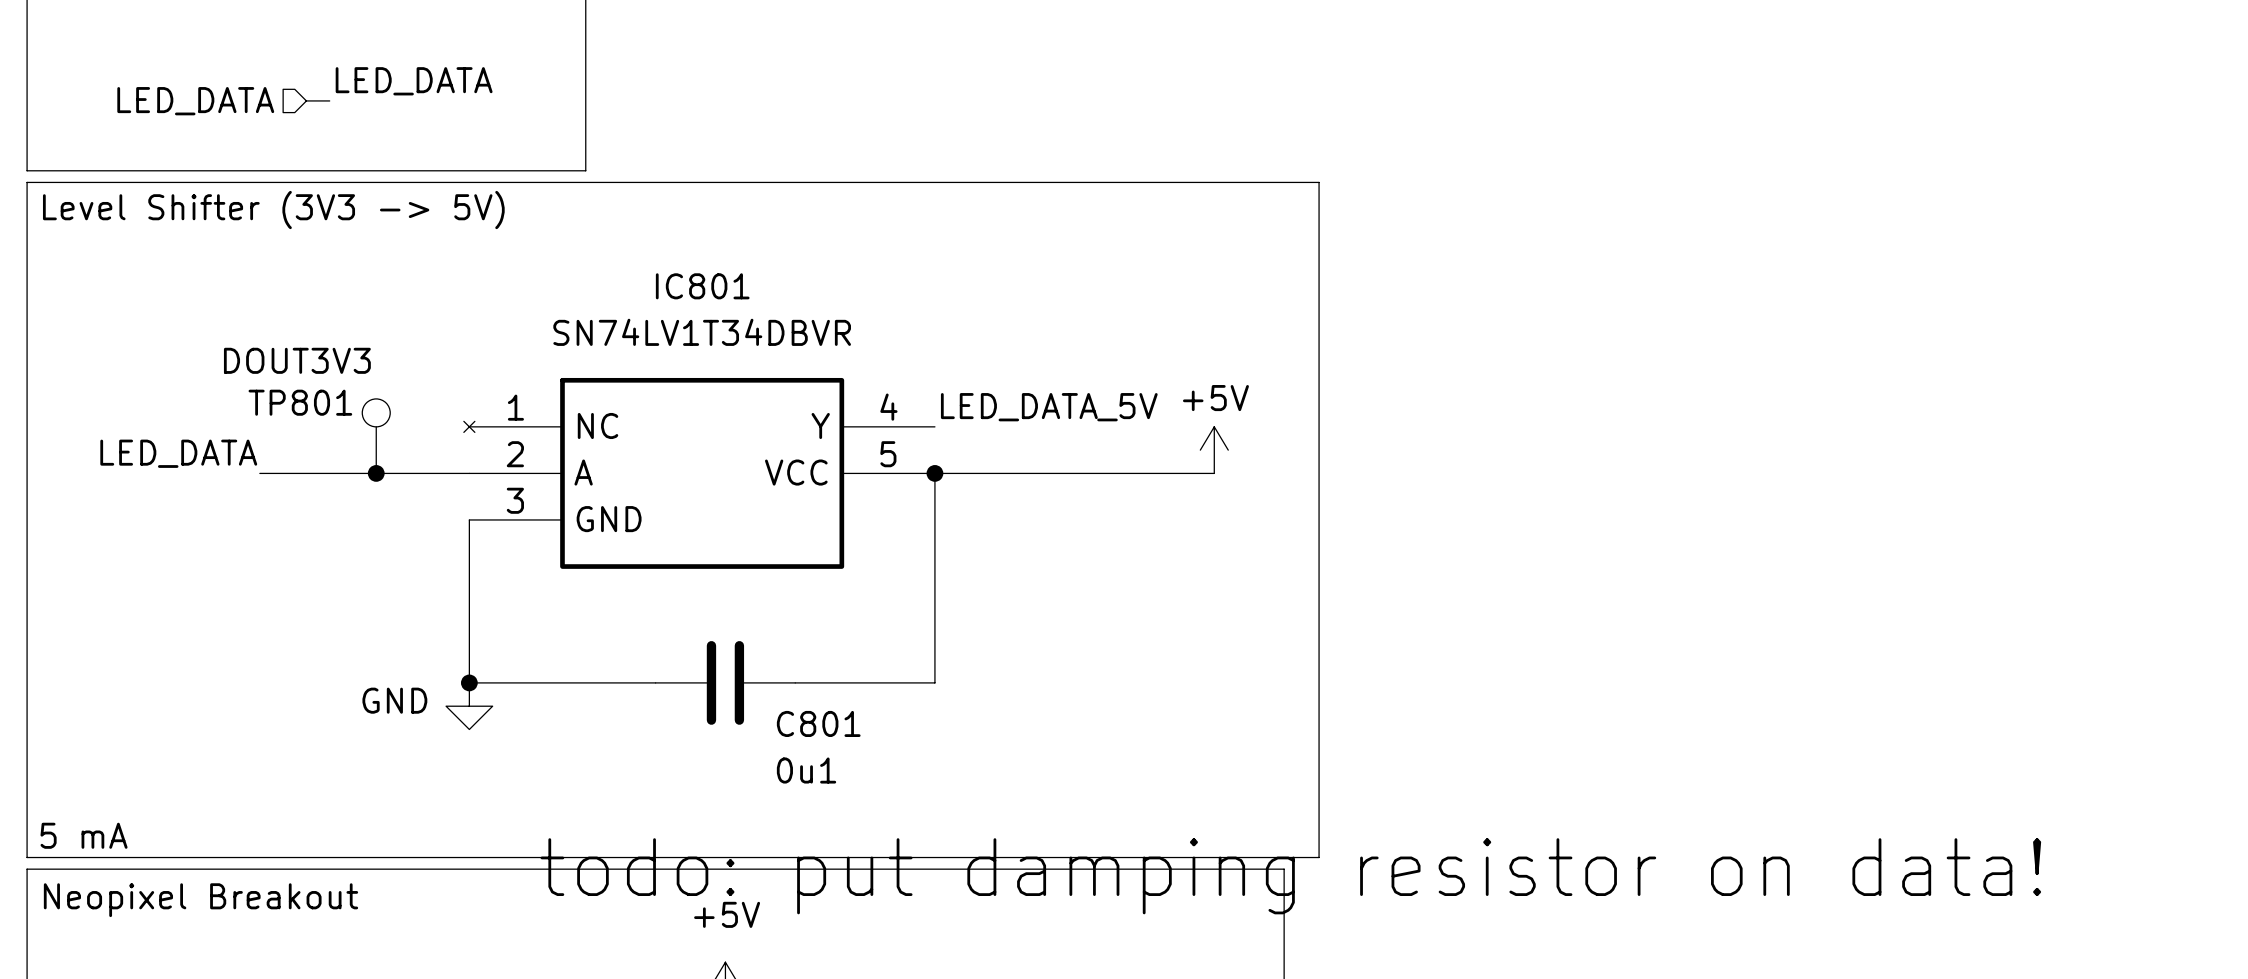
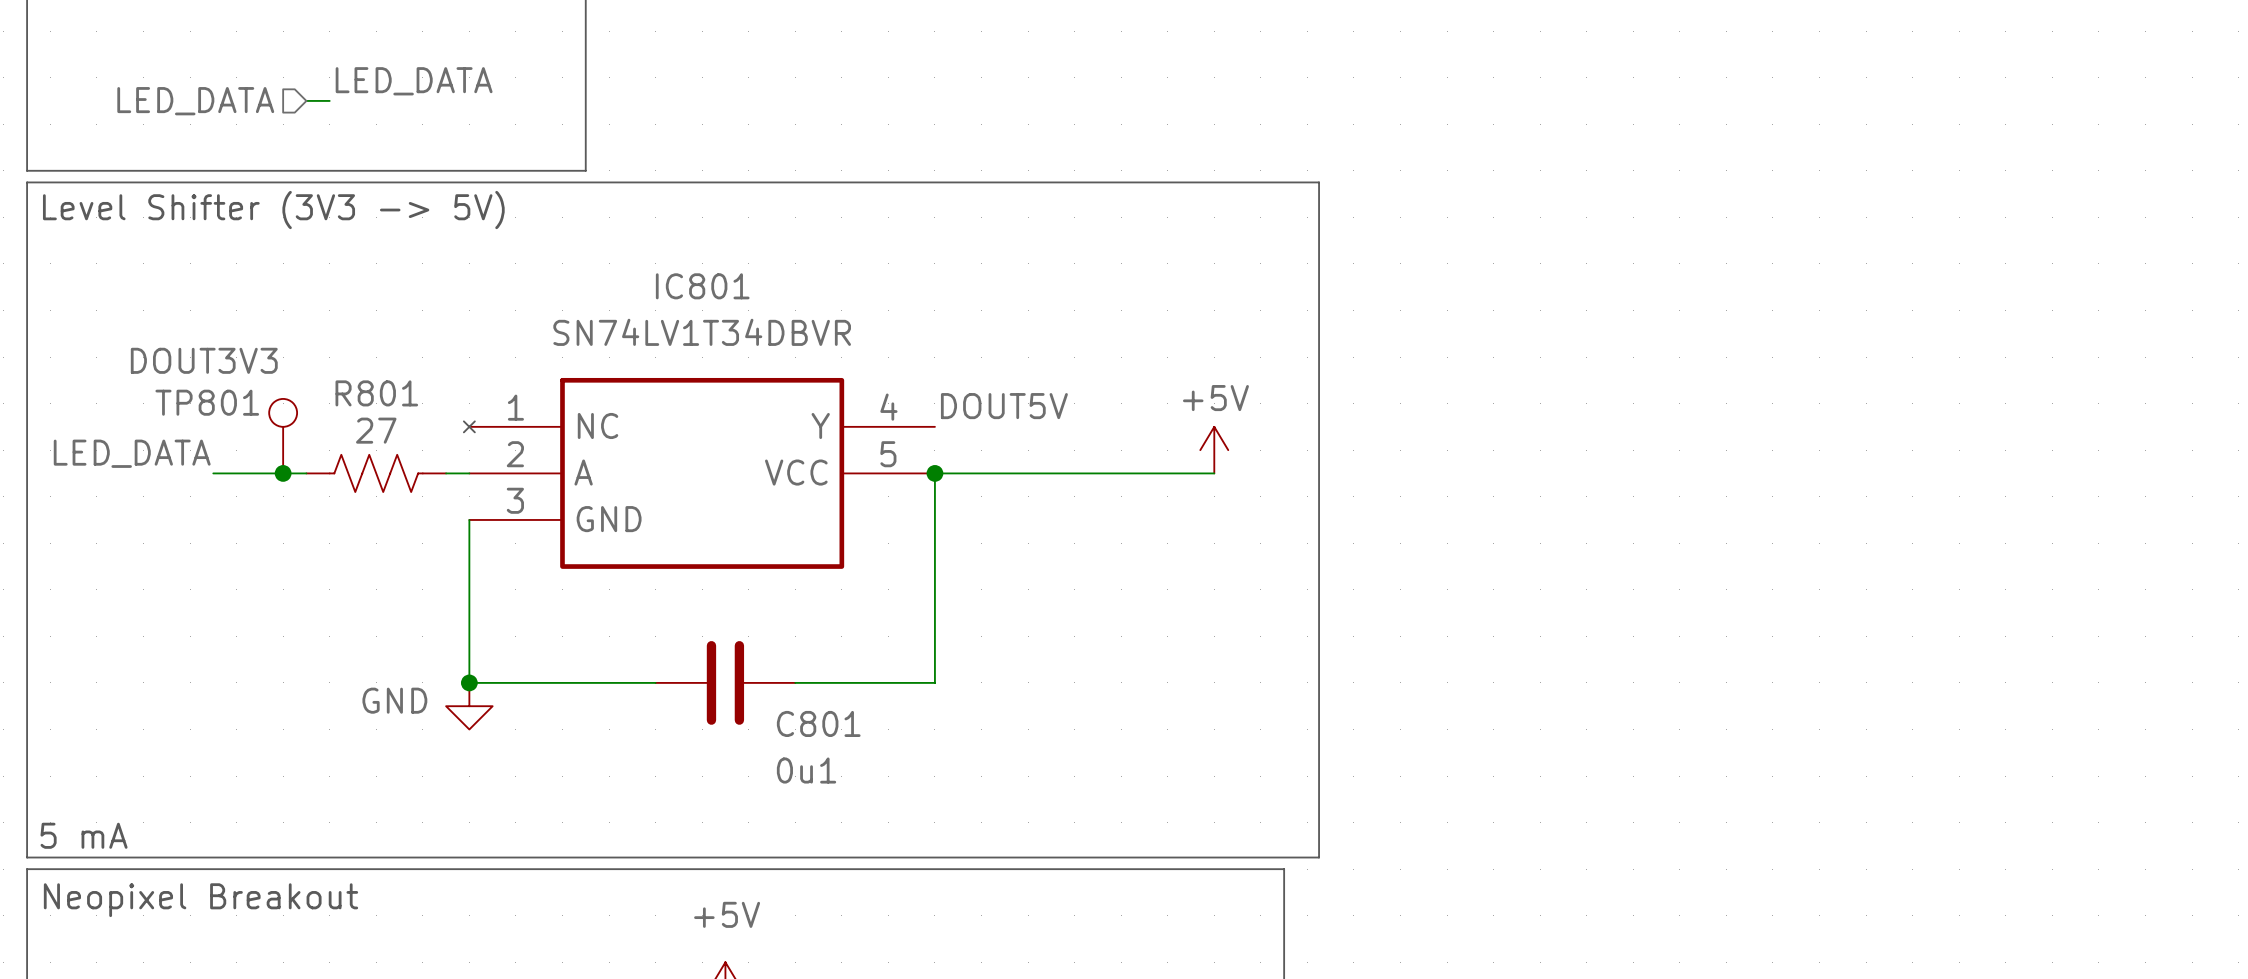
label: LED_DATA_5V (1049, 407) -> DOUT5V (1004, 406)
TP801 position: (376, 436) -> (283, 436)
label position: LED_DATA (178, 453) -> LED_DATA (132, 453)
wire: none -> (213, 473) (259, 473)
wire: (306, 473) (446, 473) -> none
junction position: (376, 473) -> (283, 473)
R801: none -> 27 (376, 473)
text: todo: put damping resistor on data! (1290, 876) -> none

